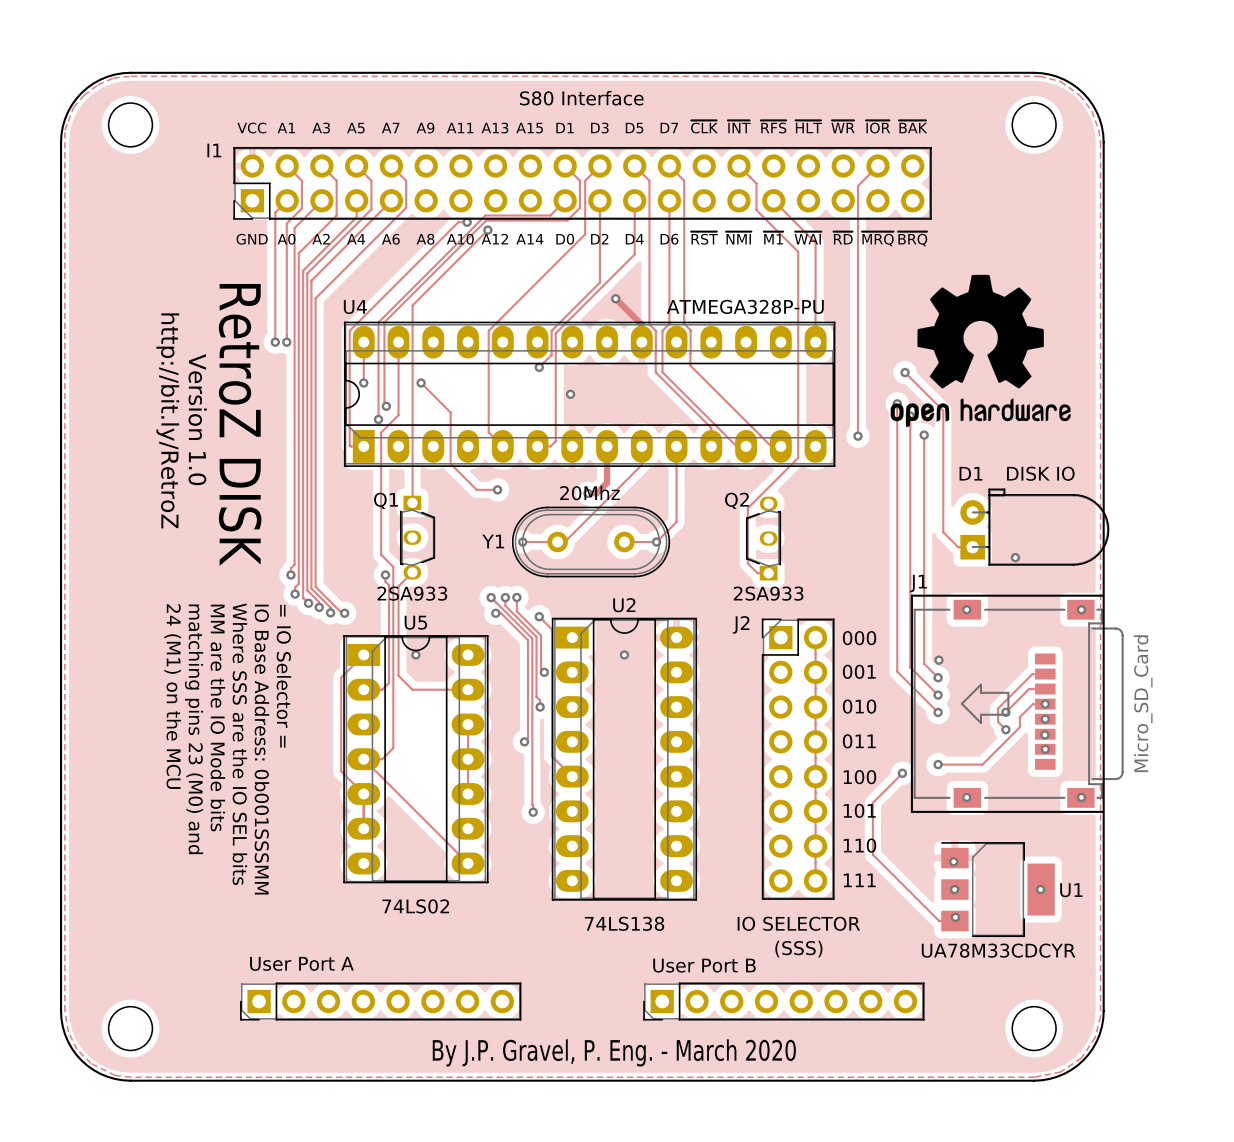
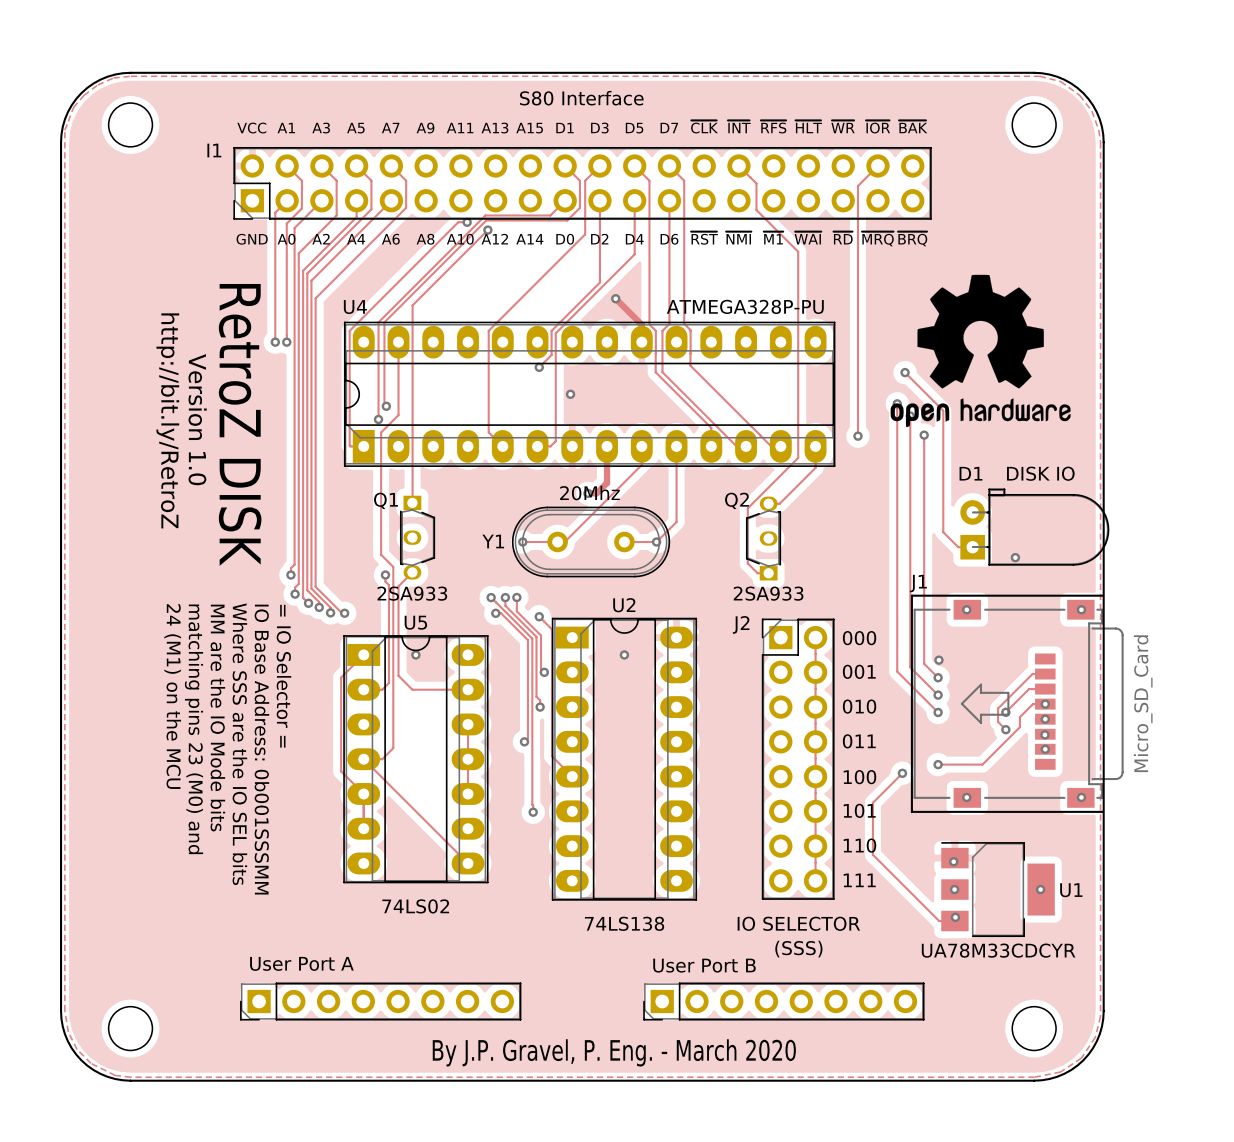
track: (773, 200) (815, 242) (815, 342) -> none
track: (363, 342) (363, 383) -> none
via: (363, 383) -> none
track: (421, 383) (450, 412) (450, 463) (476, 489) (497, 489) -> none
via: (421, 383) -> none
track: none -> (815, 446) (815, 467) (779, 503) (768, 503)
via: (497, 489) -> none

